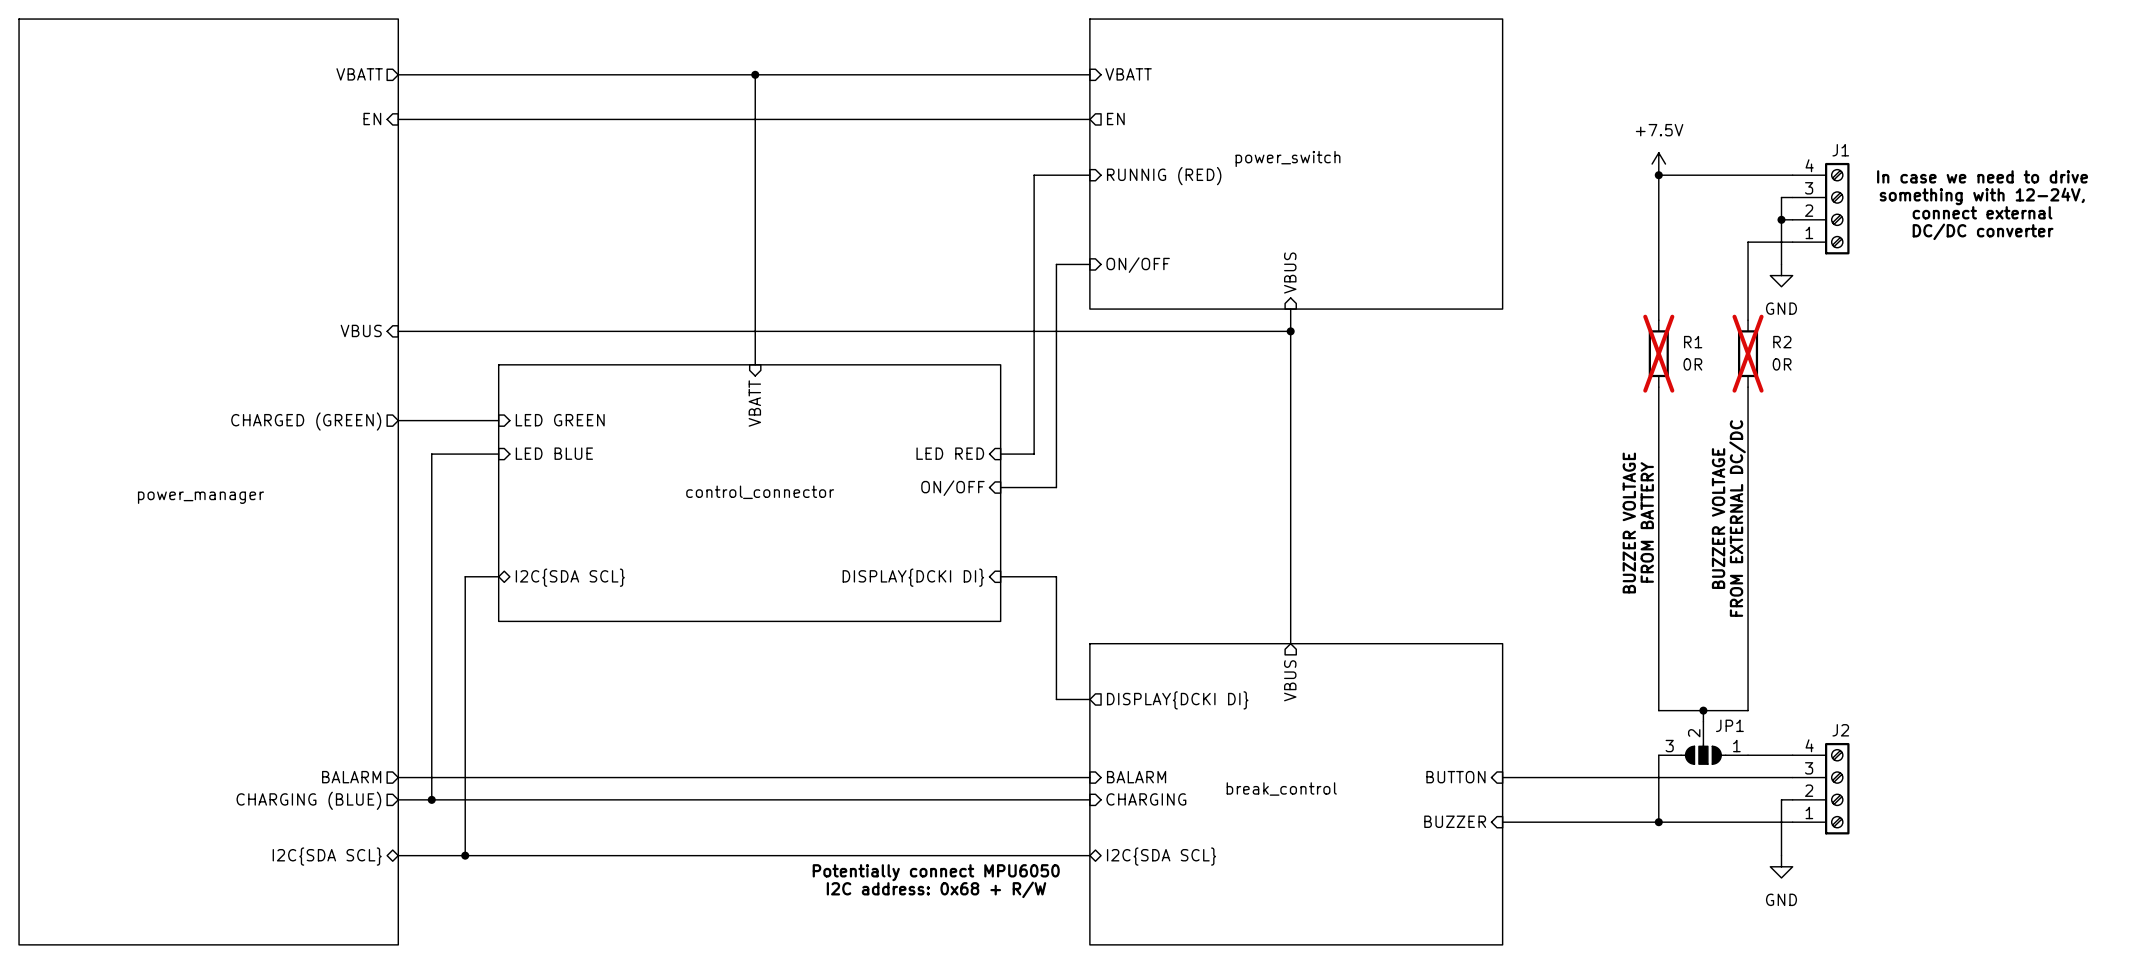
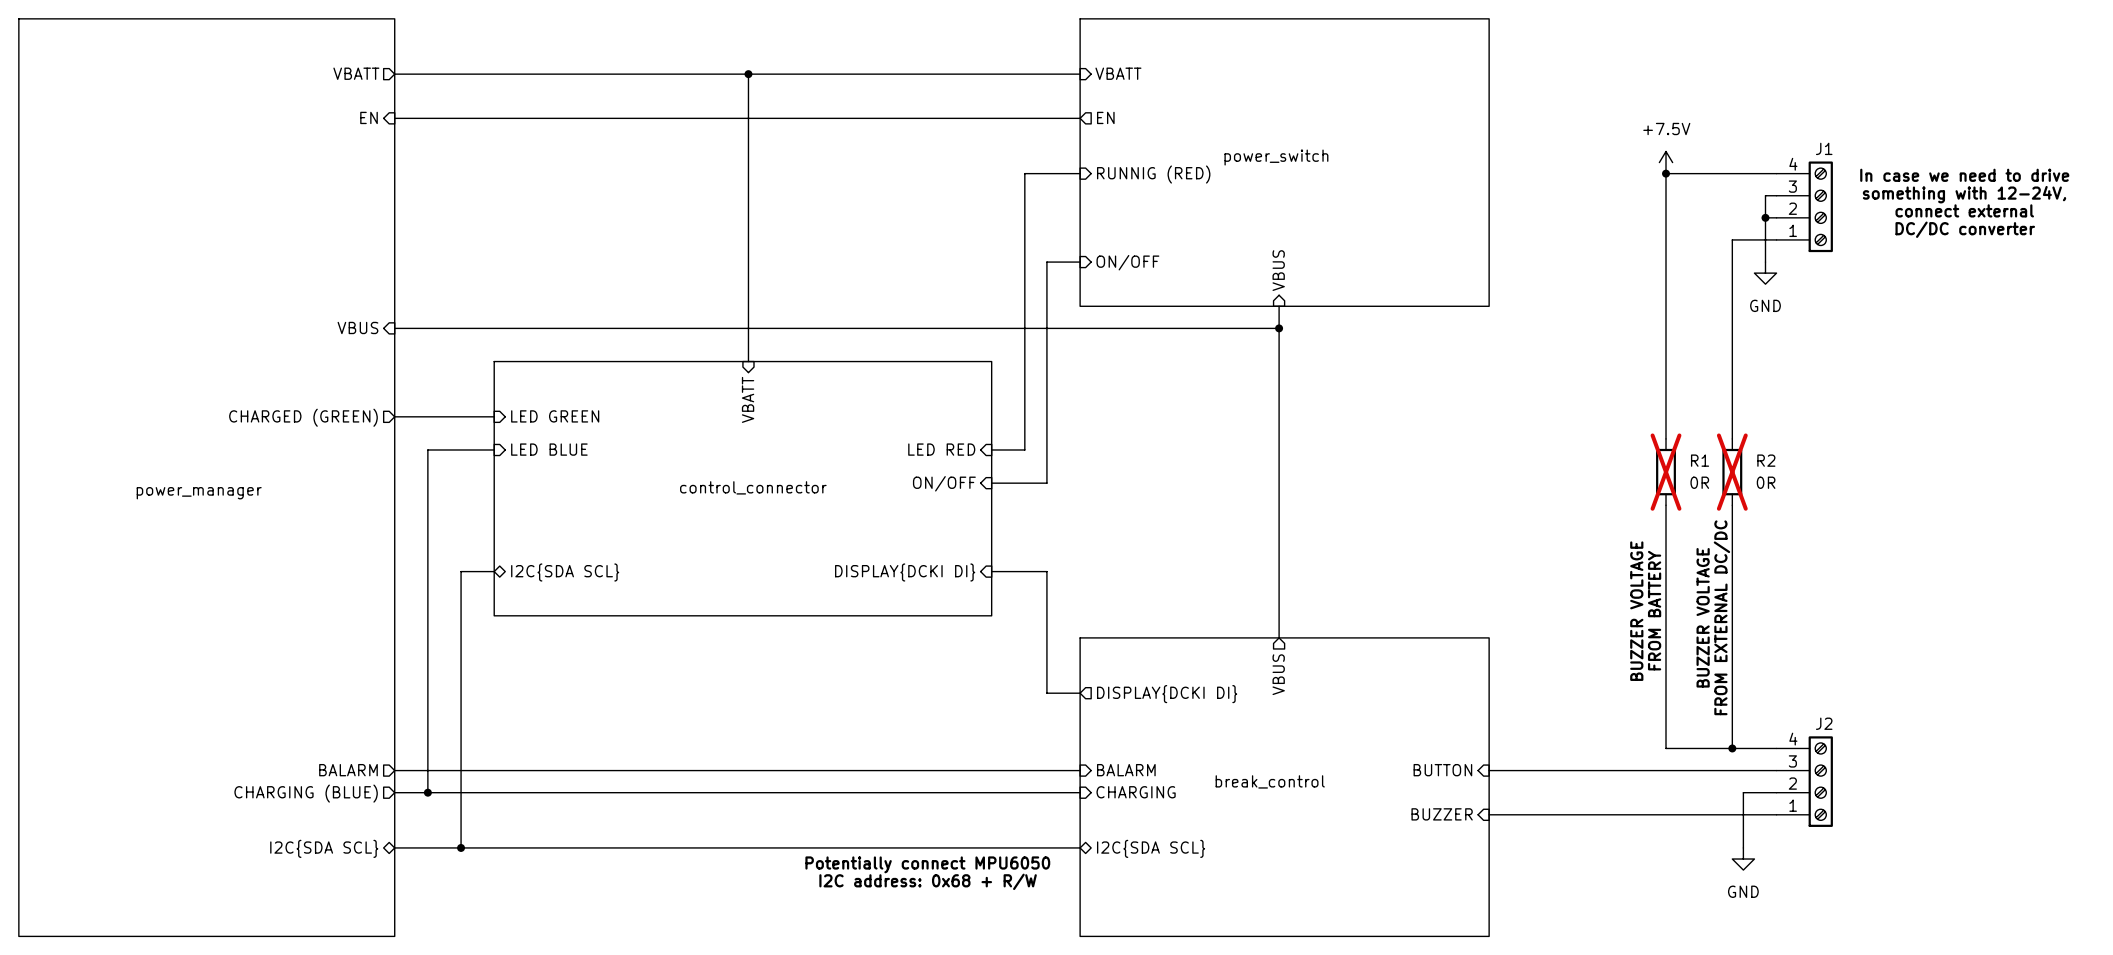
power symbol position: +7.5V (1658, 164) -> +7.5V (1666, 162)
junction position: (1658, 175) -> (1666, 173)
wire: (1681, 175) (1658, 175) (1658, 320) -> (1666, 173) (1666, 438)
R1 position: (1658, 353) -> (1666, 472)
R2 position: (1748, 353) -> (1732, 472)
wire: (1658, 387) (1658, 710) (1748, 710) -> (1666, 505) (1666, 748) (1732, 748) (1732, 704)
text position: BUZZER VOLTAGE (1718, 518) -> BUZZER VOLTAGE (1703, 617)
text position: FROM EXTERNAL DC/DC (1737, 518) -> FROM EXTERNAL DC/DC (1721, 617)
text position: FROM BATTERY (1647, 522) -> FROM BATTERY (1654, 610)
text position: BUZZER VOLTAGE (1629, 523) -> BUZZER VOLTAGE (1636, 611)
wire: (1703, 710) (1703, 721) -> none
junction: (1703, 710) -> none
JP1: (1703, 742) -> none
wire: (1658, 755) (1658, 822) -> none
junction: none -> (1732, 748)
wire: (1781, 799) (1781, 855) -> (1765, 792) (1743, 792) (1743, 847)
junction: (1658, 822) -> none
power symbol position: GND (1781, 866) -> GND (1743, 859)

